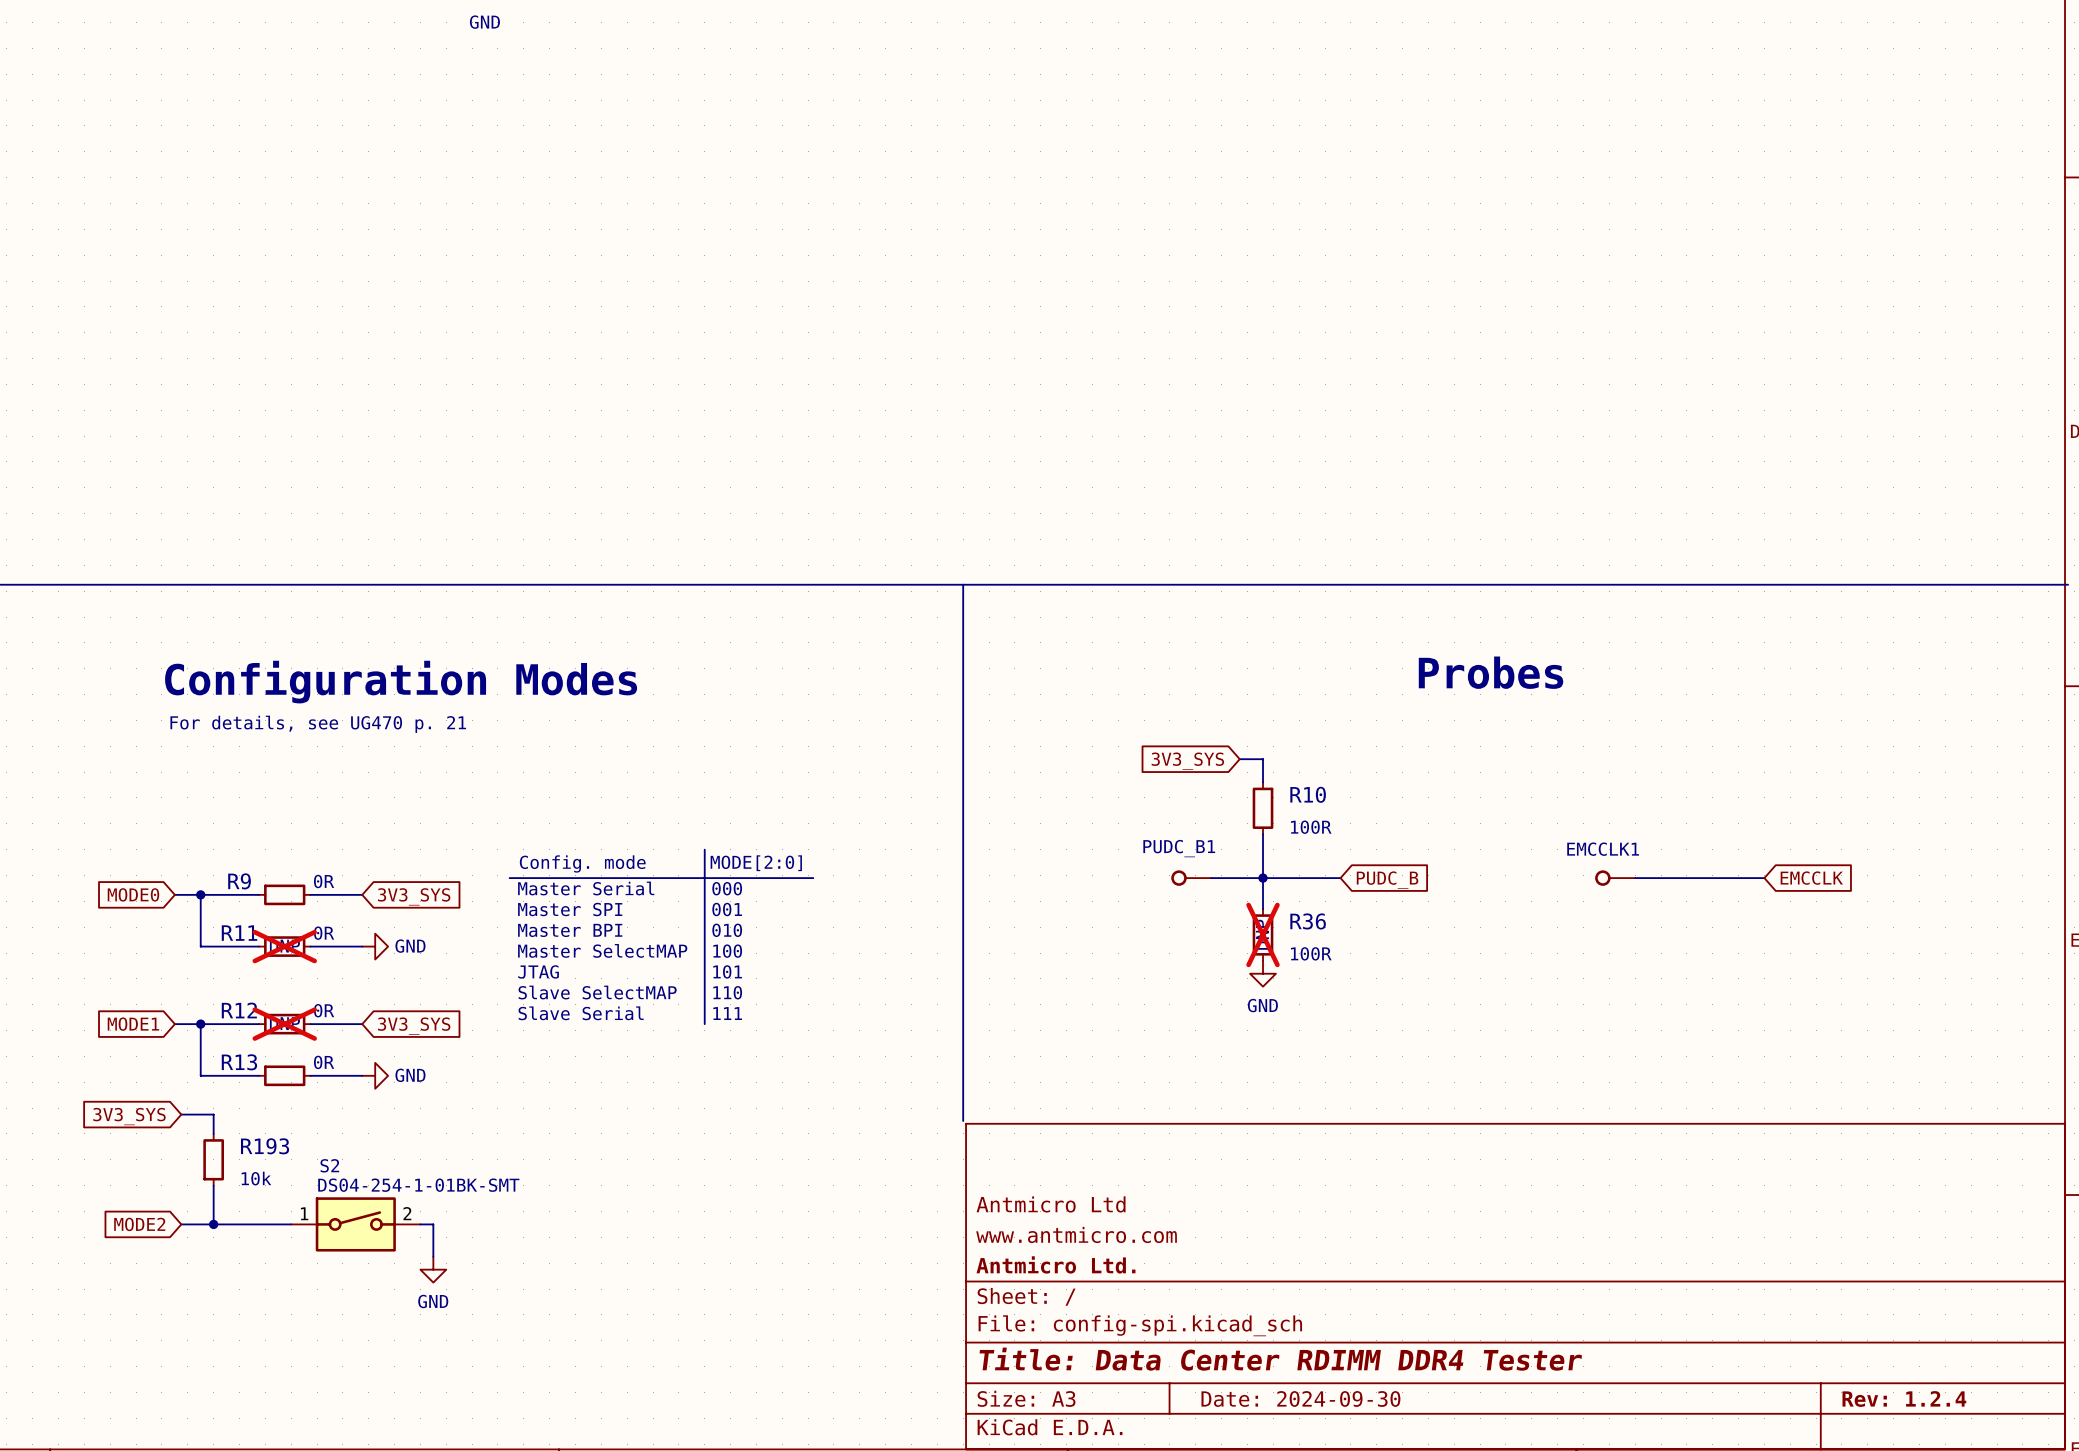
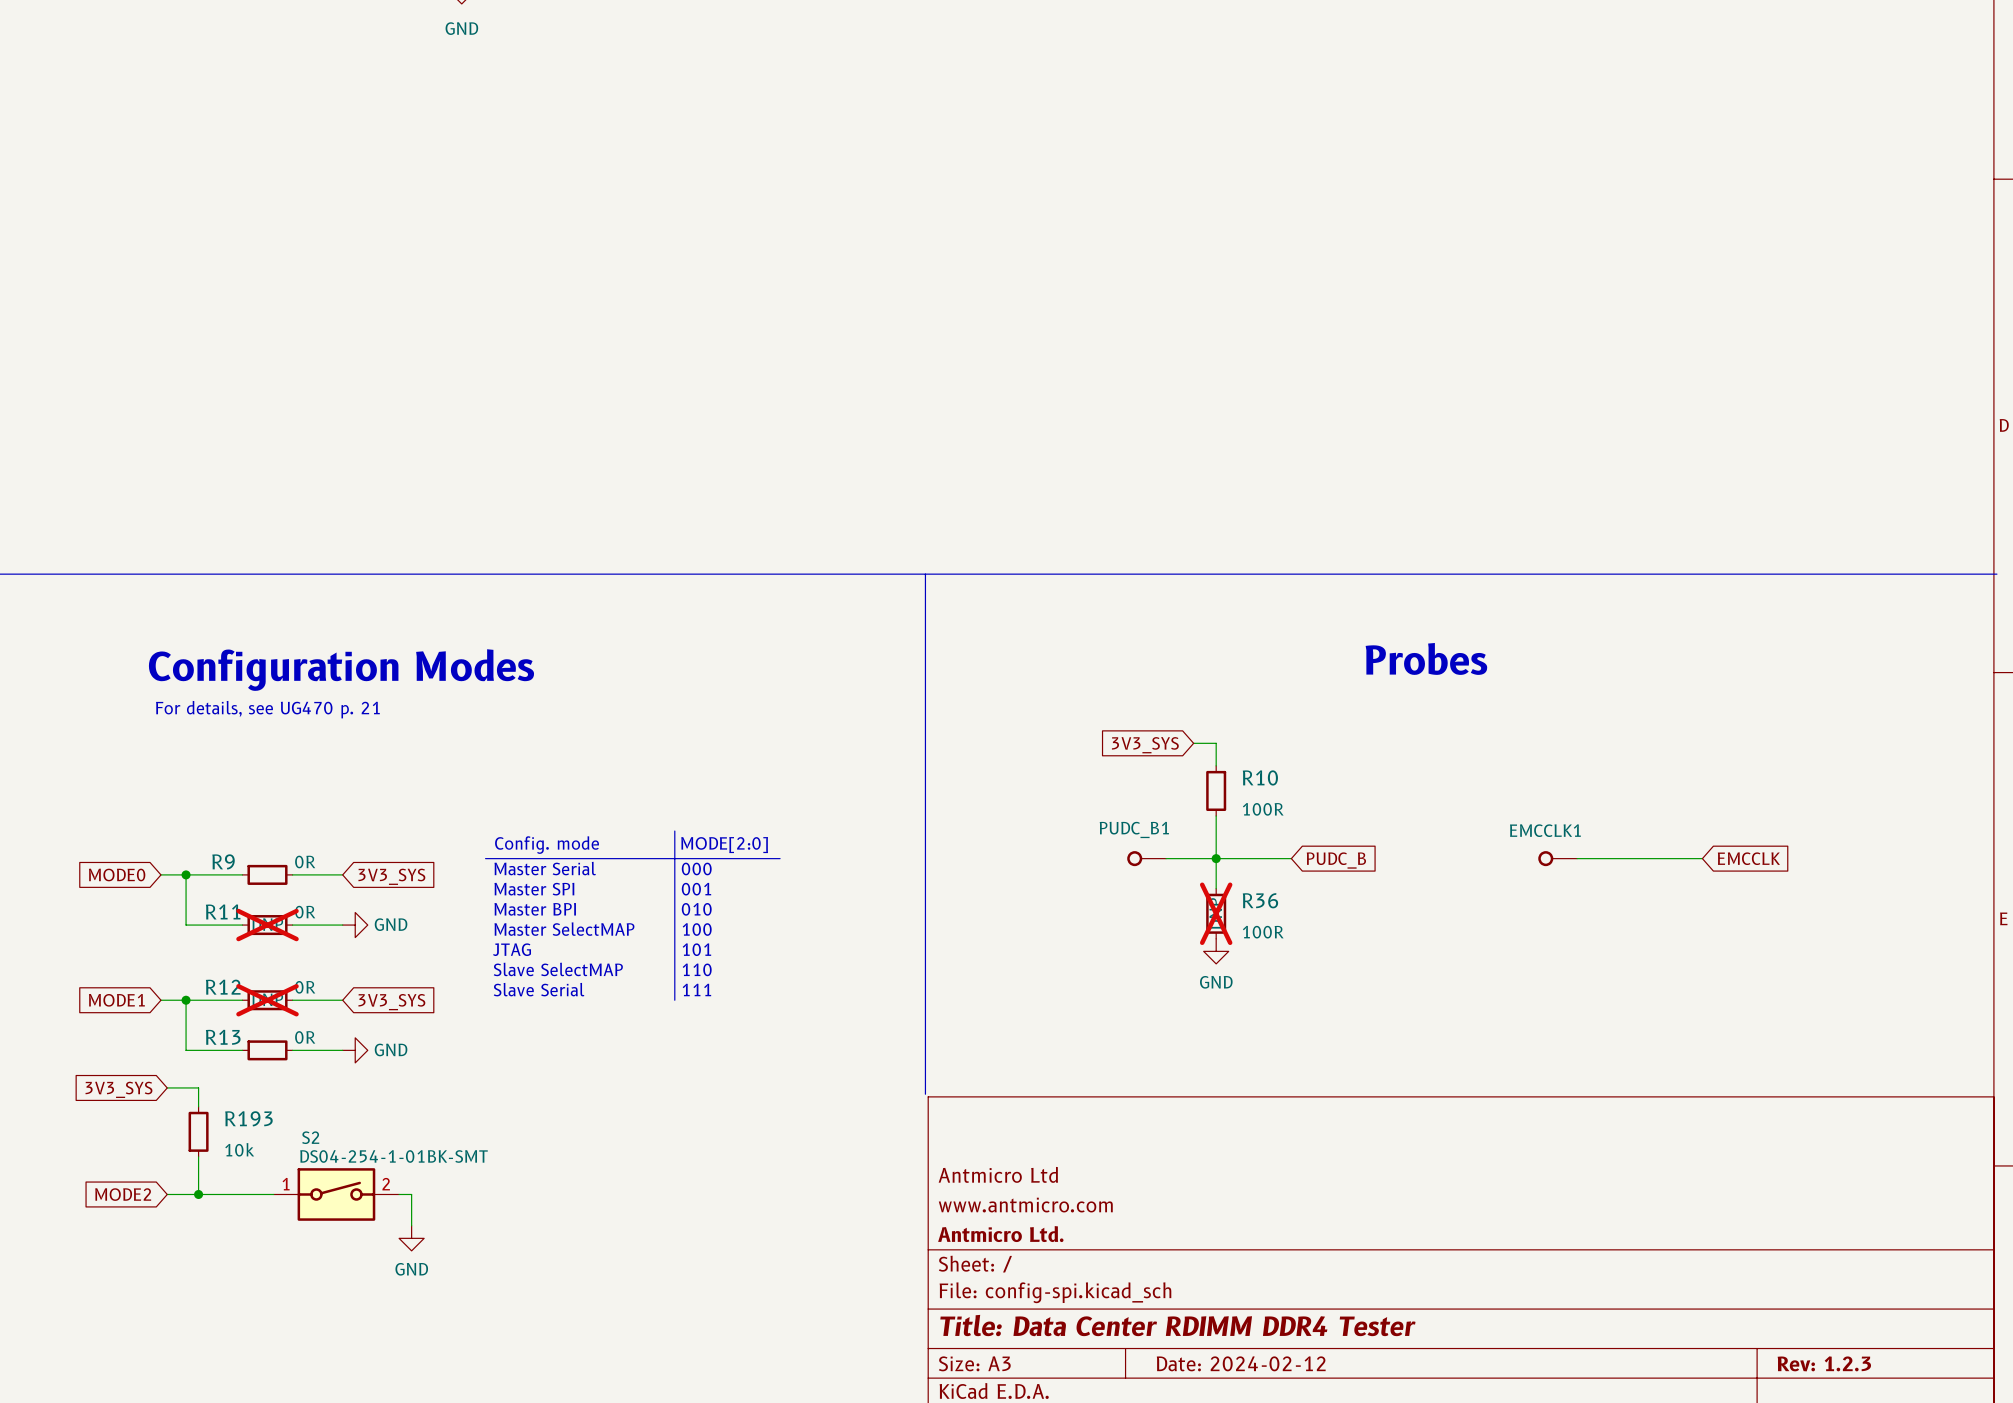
title block: Date: 2024-09-30 (1300, 1398) -> Date: 2024-02-12 (1241, 1363)
title block: Rev: 1.2.4 (1904, 1398) -> Rev: 1.2.3 (1824, 1363)

